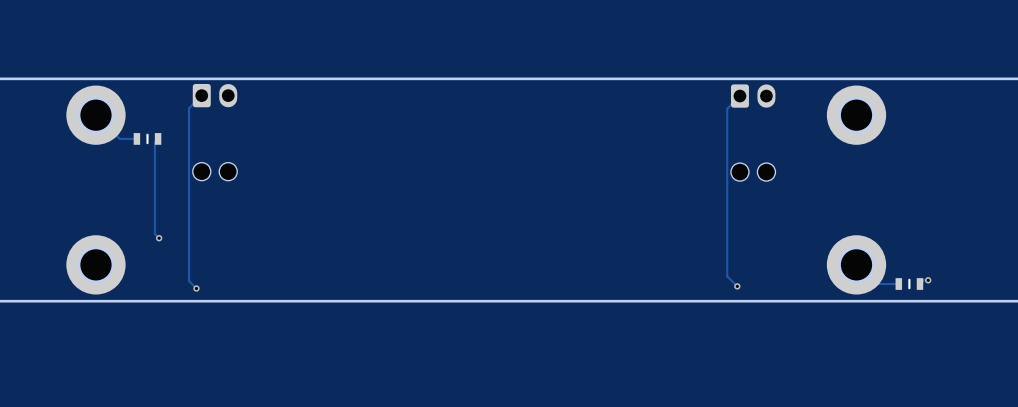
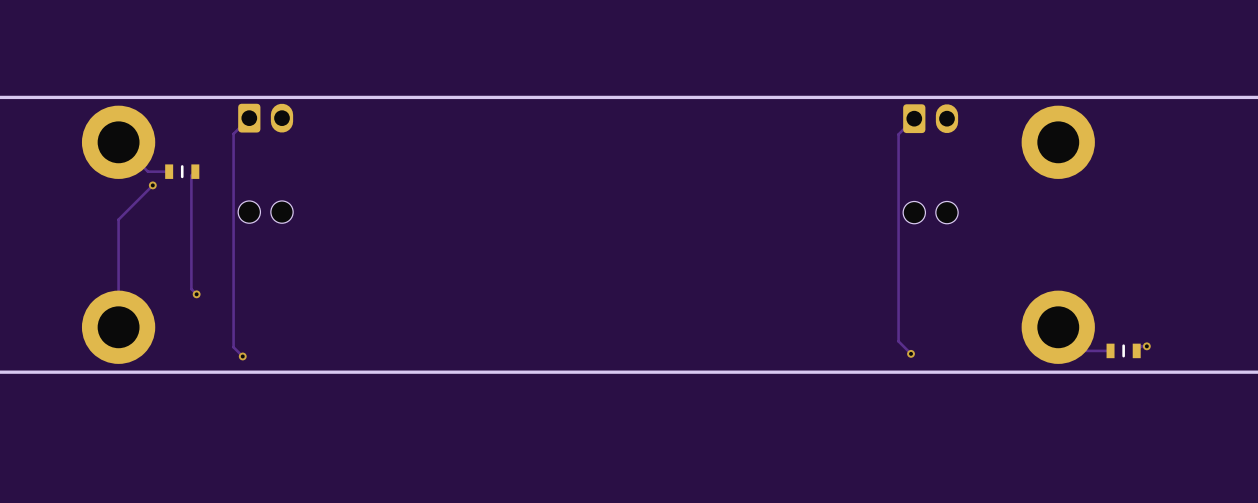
round board edge: [77, 96, 115, 134] -> none
round board edge: [838, 96, 875, 134] -> none
track: none -> (152, 185) (118, 219) (118, 327)
via: none -> (152, 185)
round board edge: [77, 246, 115, 284] -> none
round board edge: [838, 246, 875, 284] -> none

